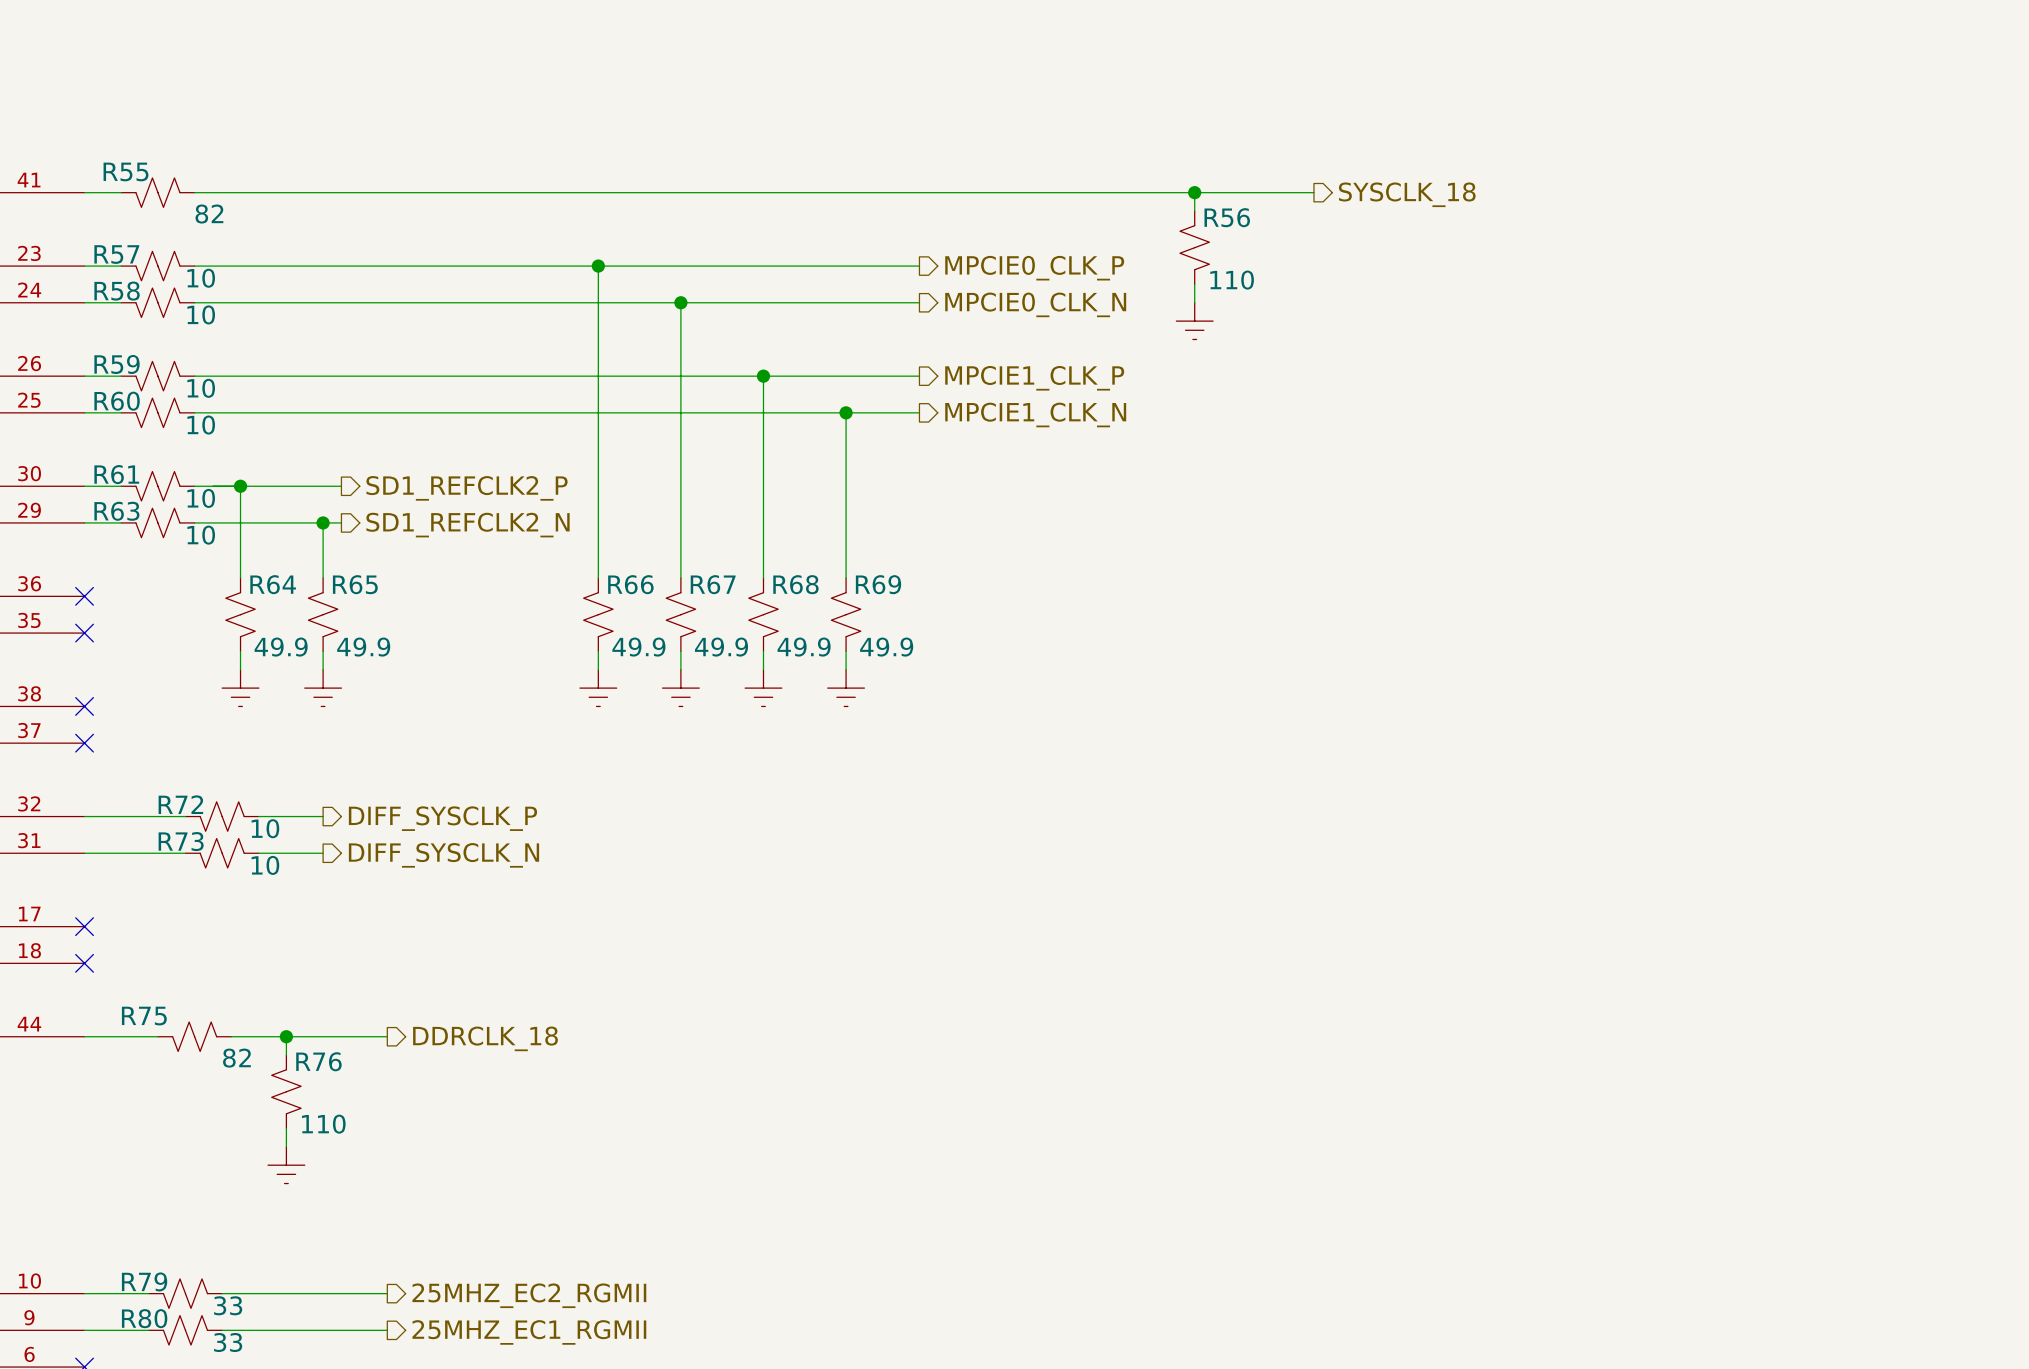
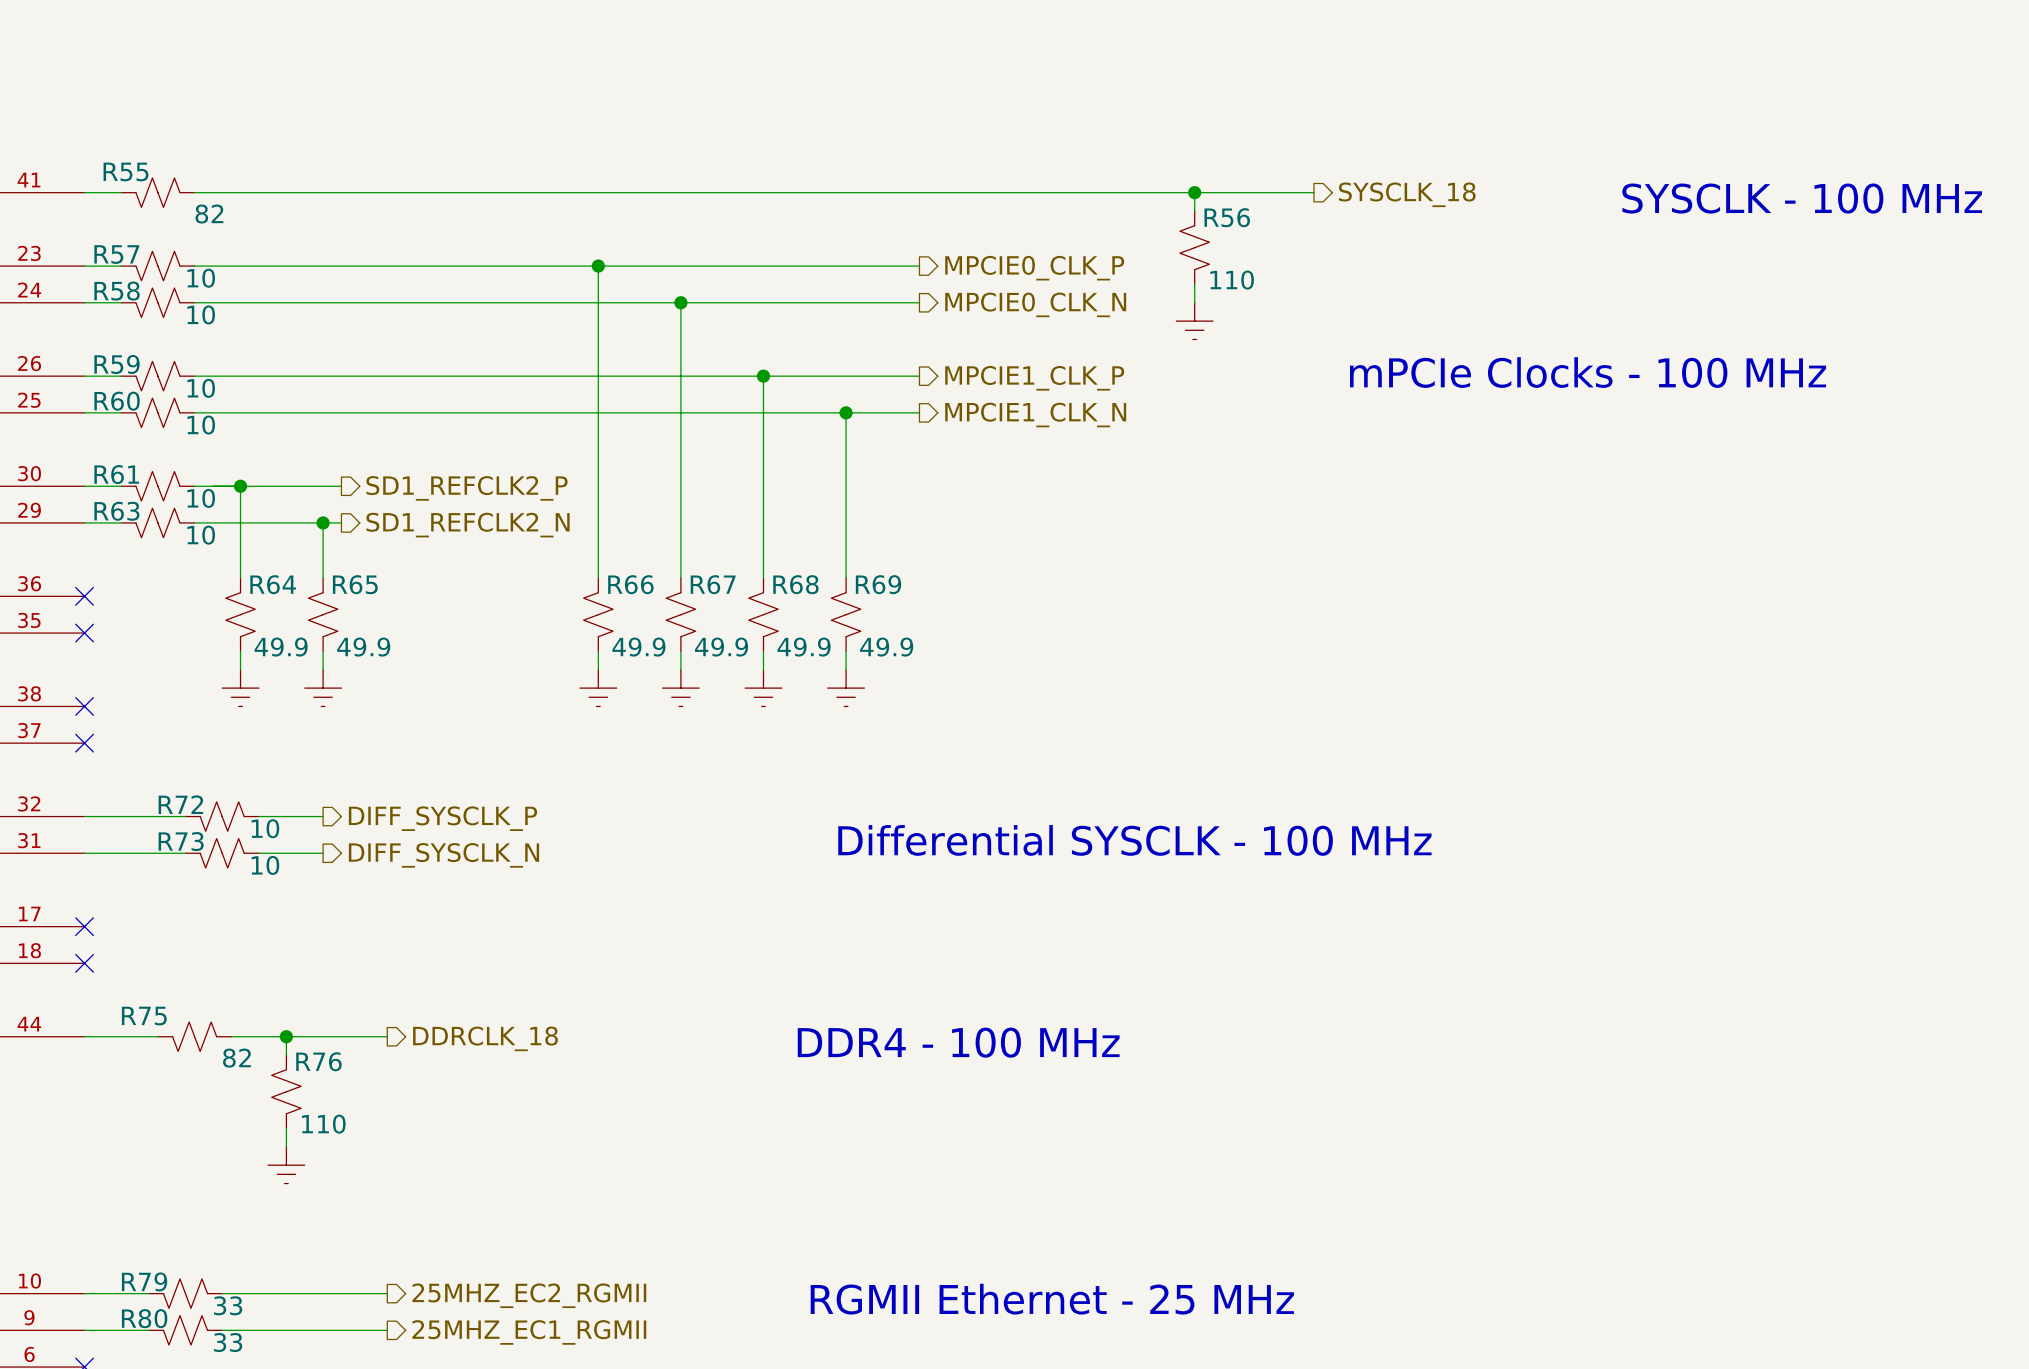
text: none -> SYSCLK - 100 MHz (1802, 198)
text: none -> mPCIe Clocks - 100 MHz (1588, 372)
text: none -> Differential SYSCLK - 100 MHz (1134, 840)
text: none -> DDR4 - 100 MHz (958, 1042)
text: none -> RGMII Ethernet - 25 MHz (1052, 1299)

